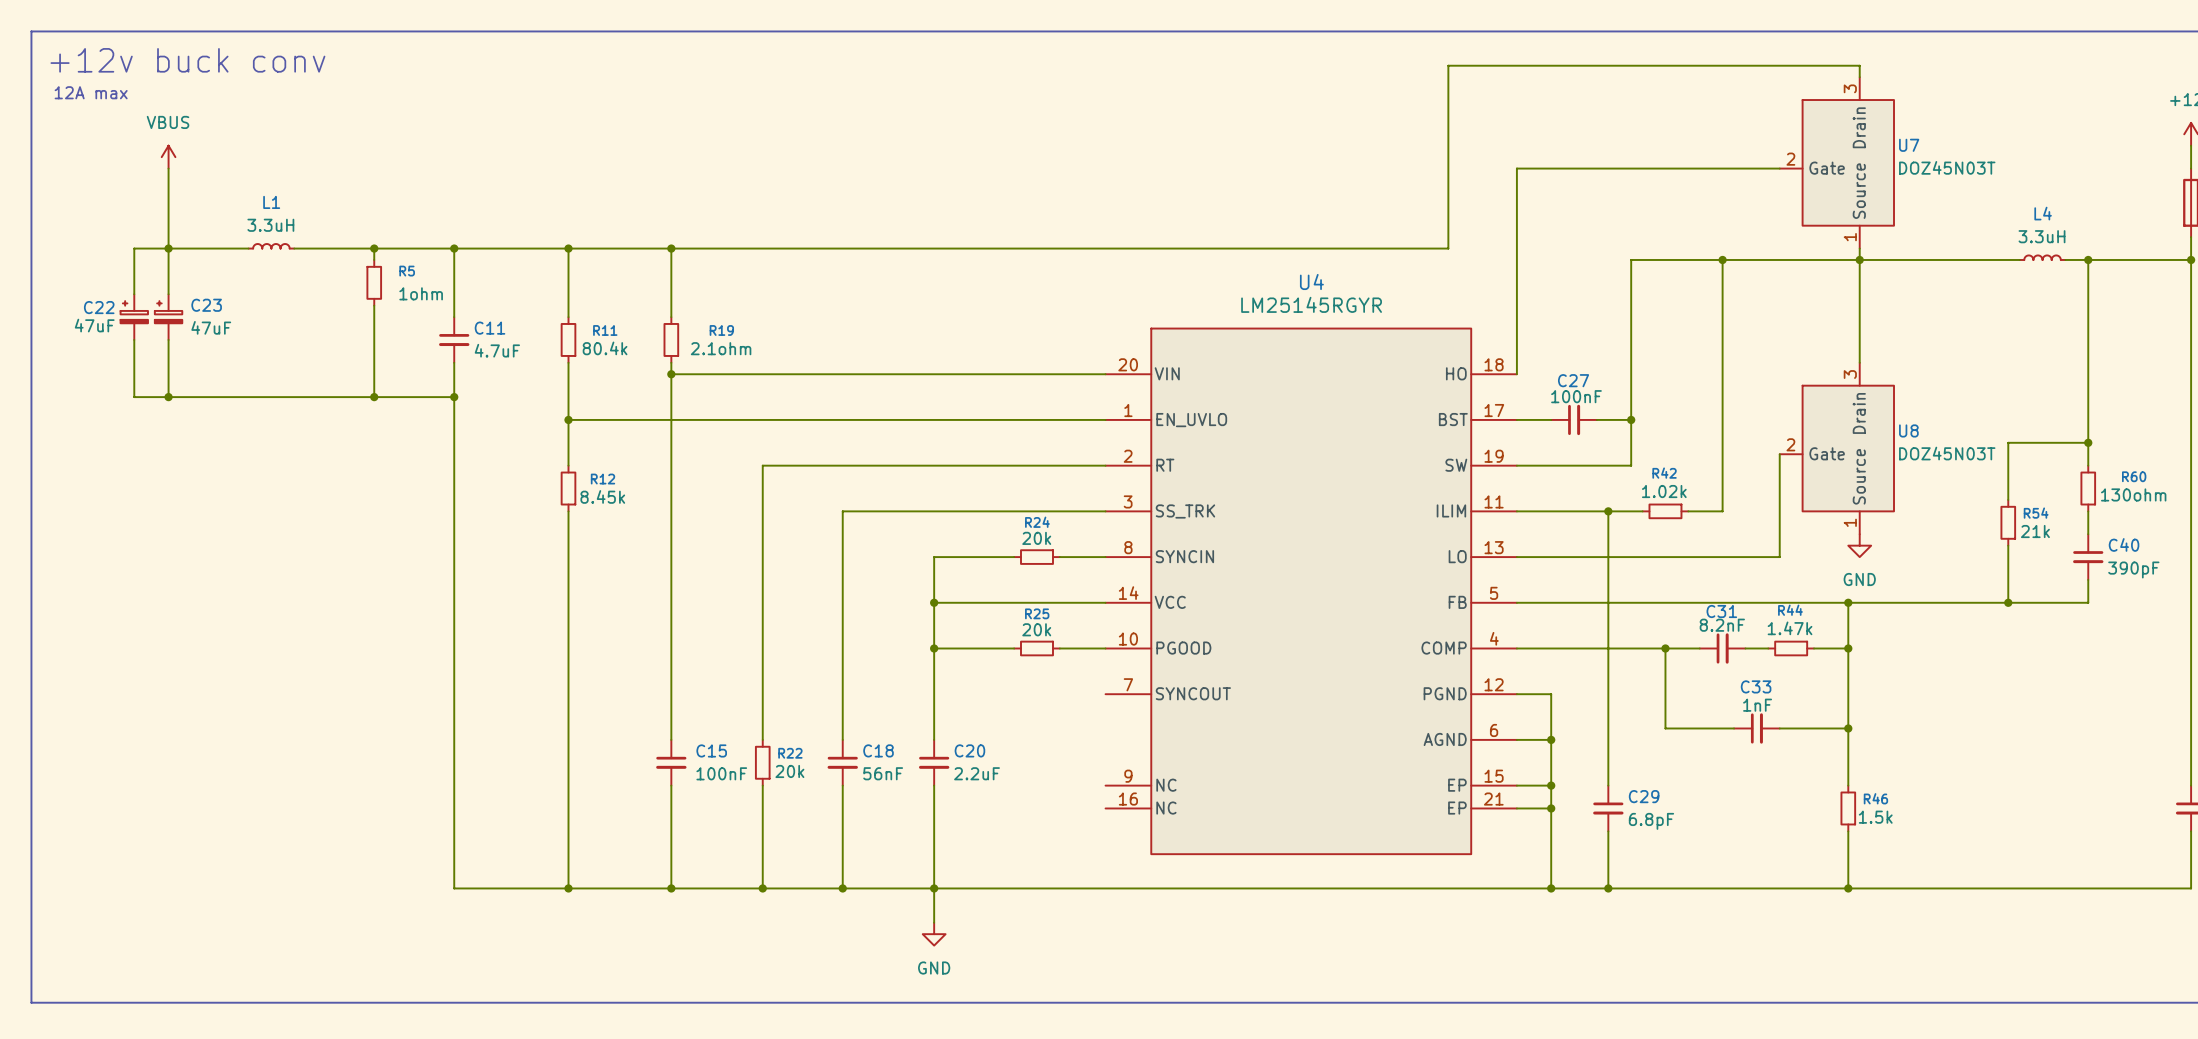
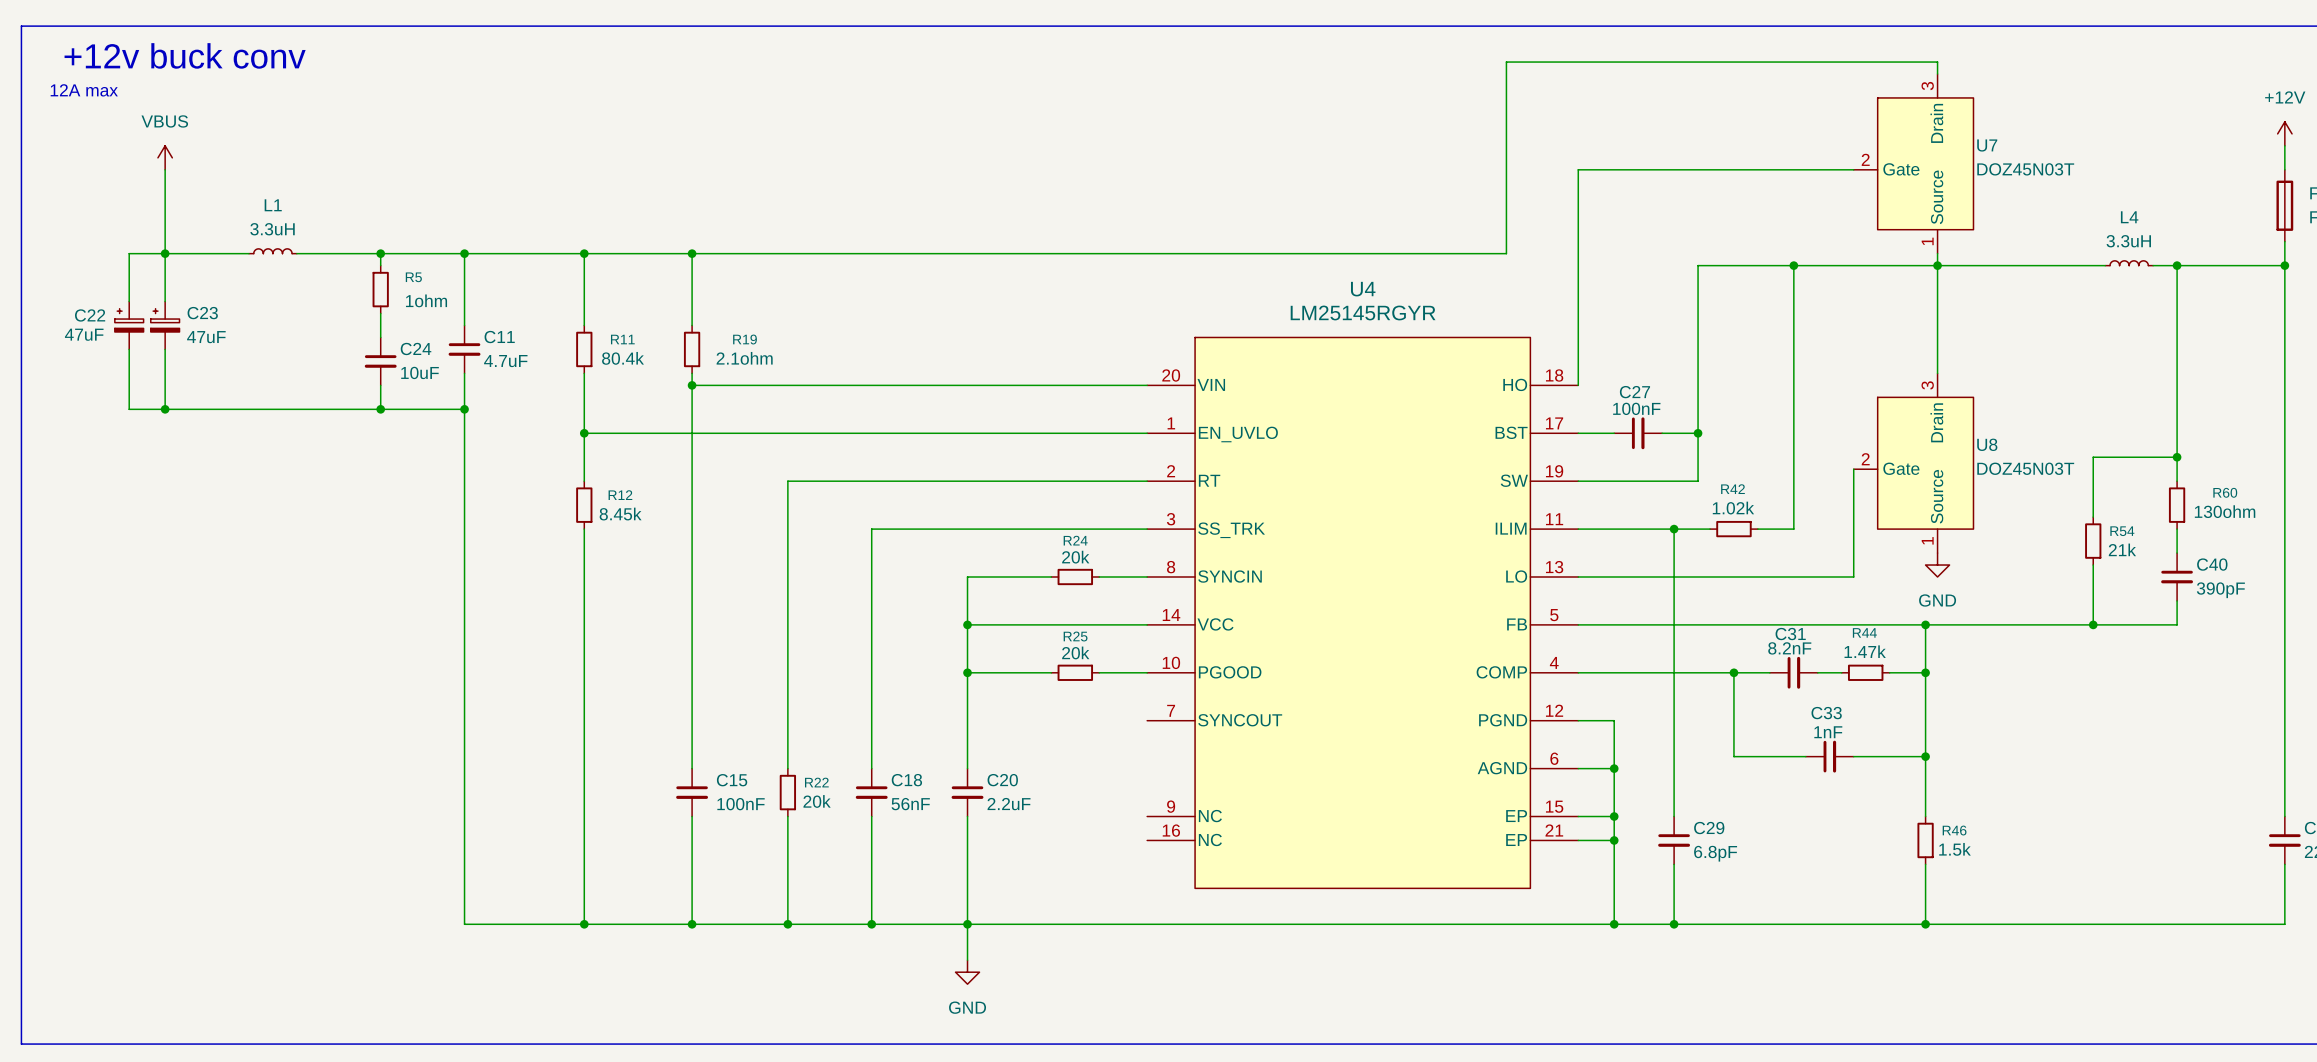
C24: none -> 10uF (380, 361)

